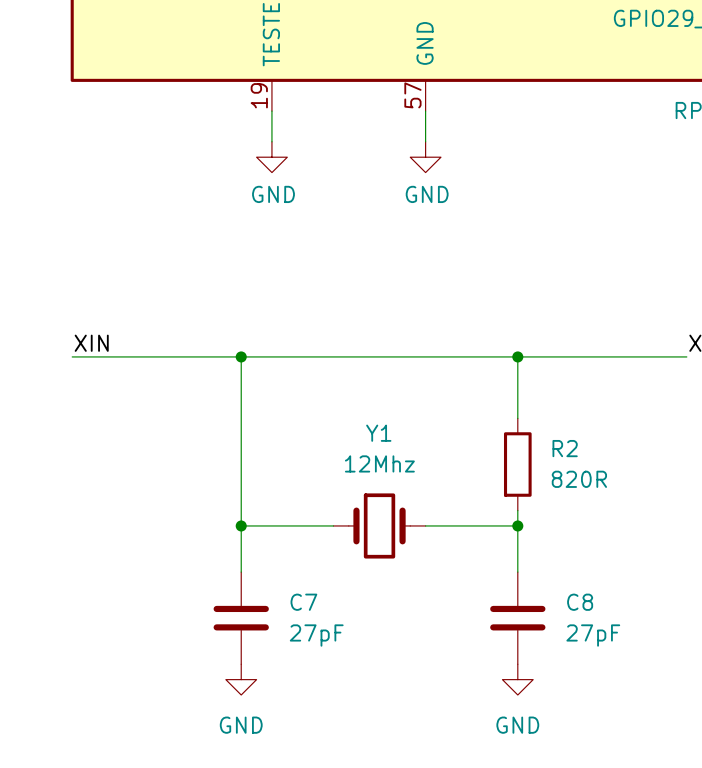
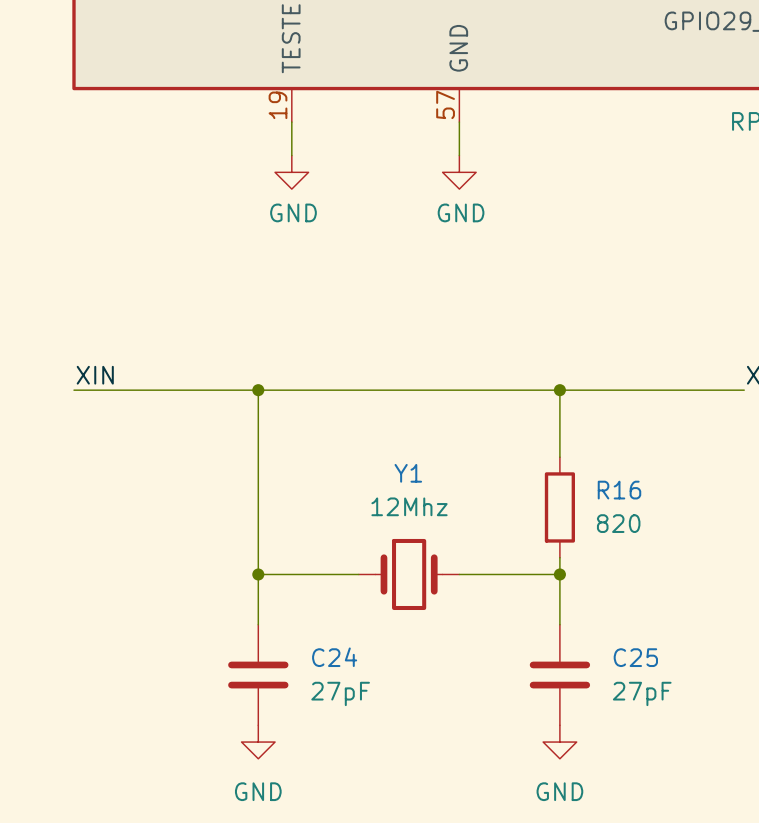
R2 name: R2 (565, 448) -> R16 (619, 490)
R2 value: 820R (579, 479) -> 820 (618, 523)
C7 name: C7 (303, 602) -> C24 (334, 657)
C8 name: C8 (580, 602) -> C25 (635, 657)

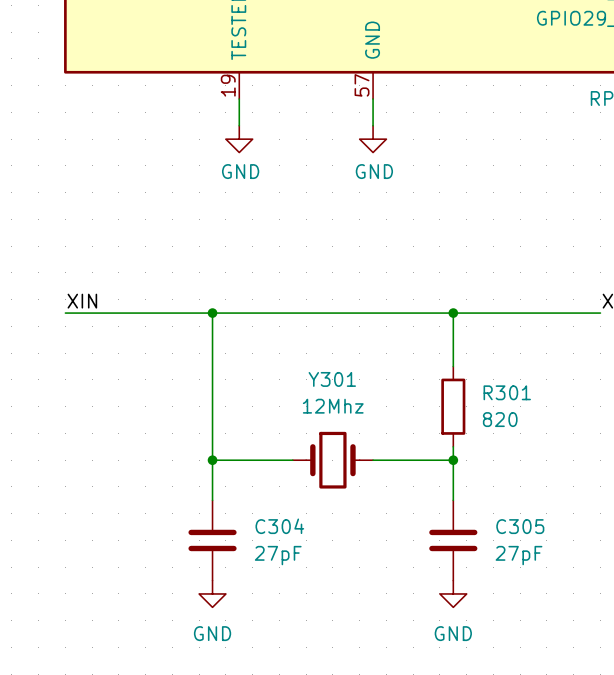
Y1 name: Y1 (408, 473) -> Y301 (332, 379)
R16 name: R16 (619, 490) -> R301 (507, 392)
C24 name: C24 (334, 657) -> C304 (279, 526)
C25 name: C25 (635, 657) -> C305 (520, 526)

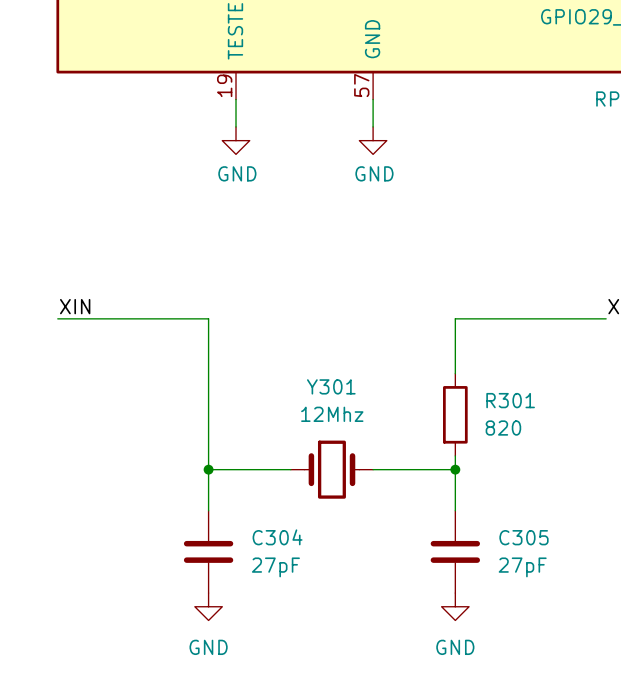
wire: (212, 313) (453, 313) -> none
junction: (212, 313) -> none
junction: (453, 313) -> none

